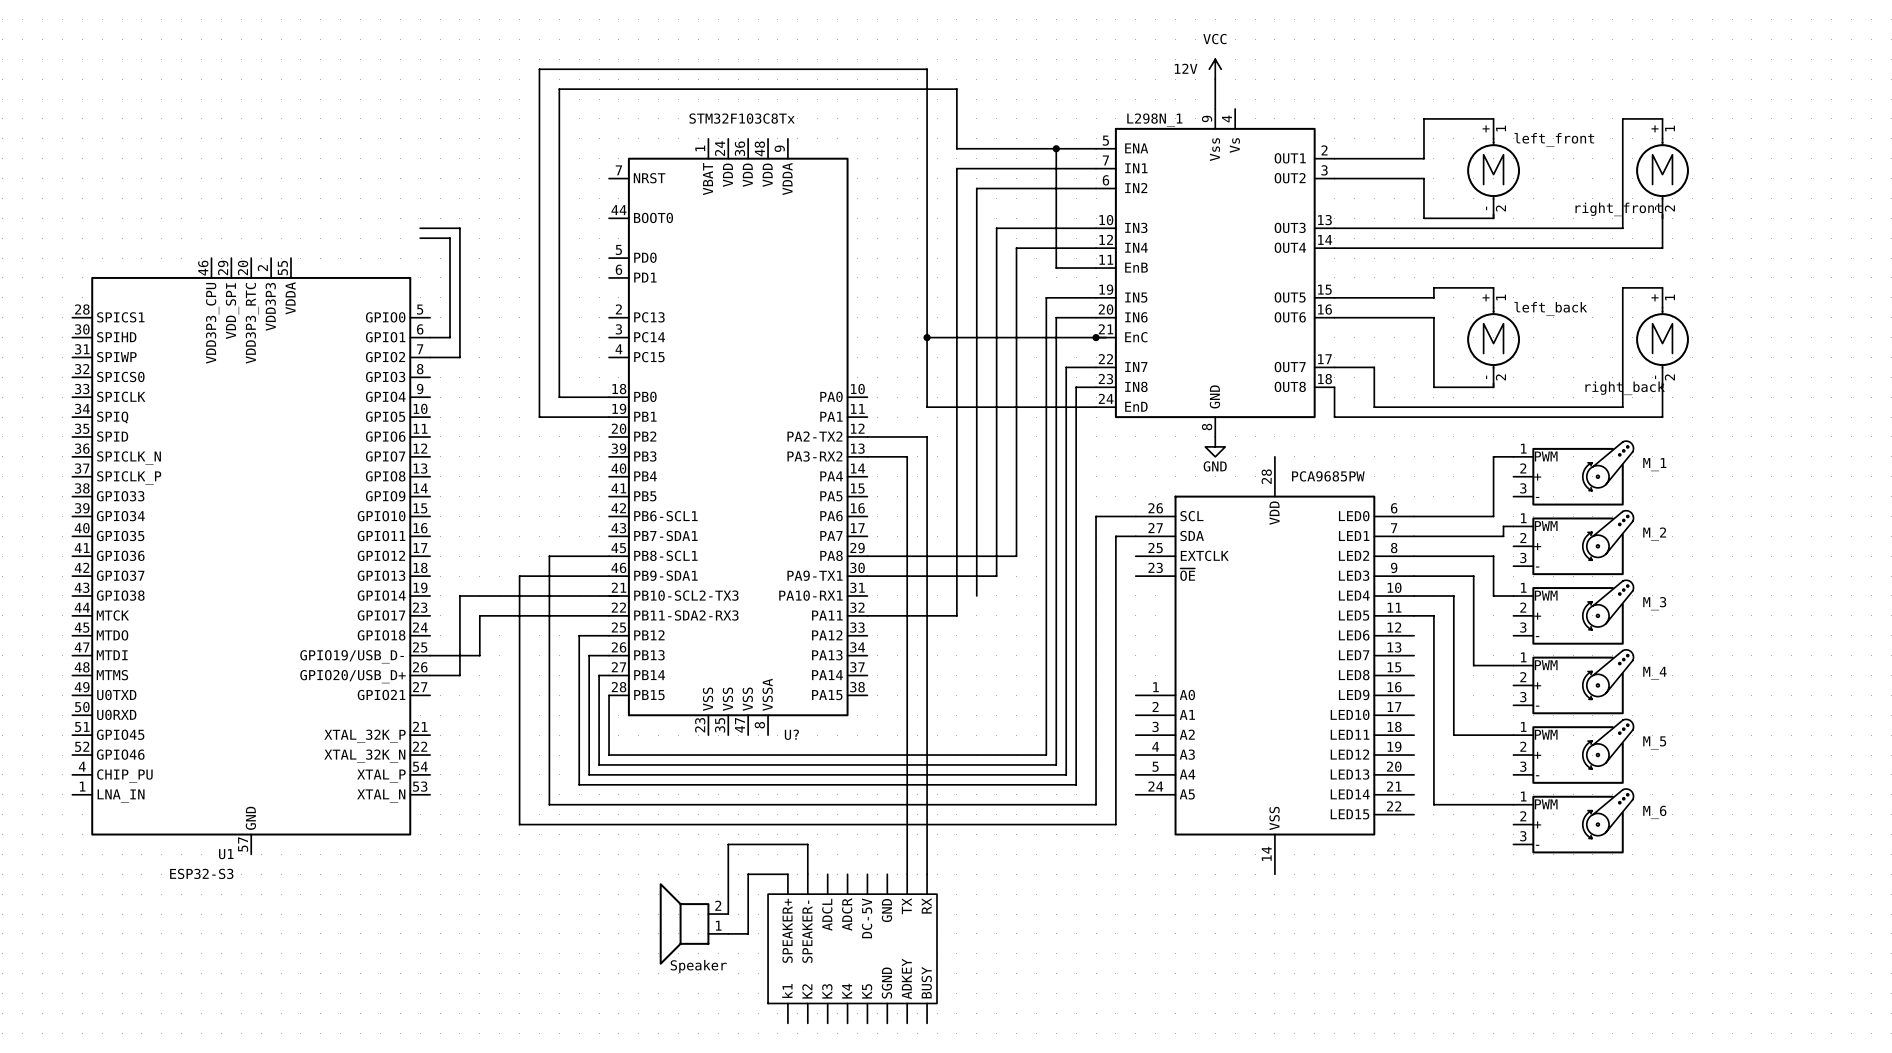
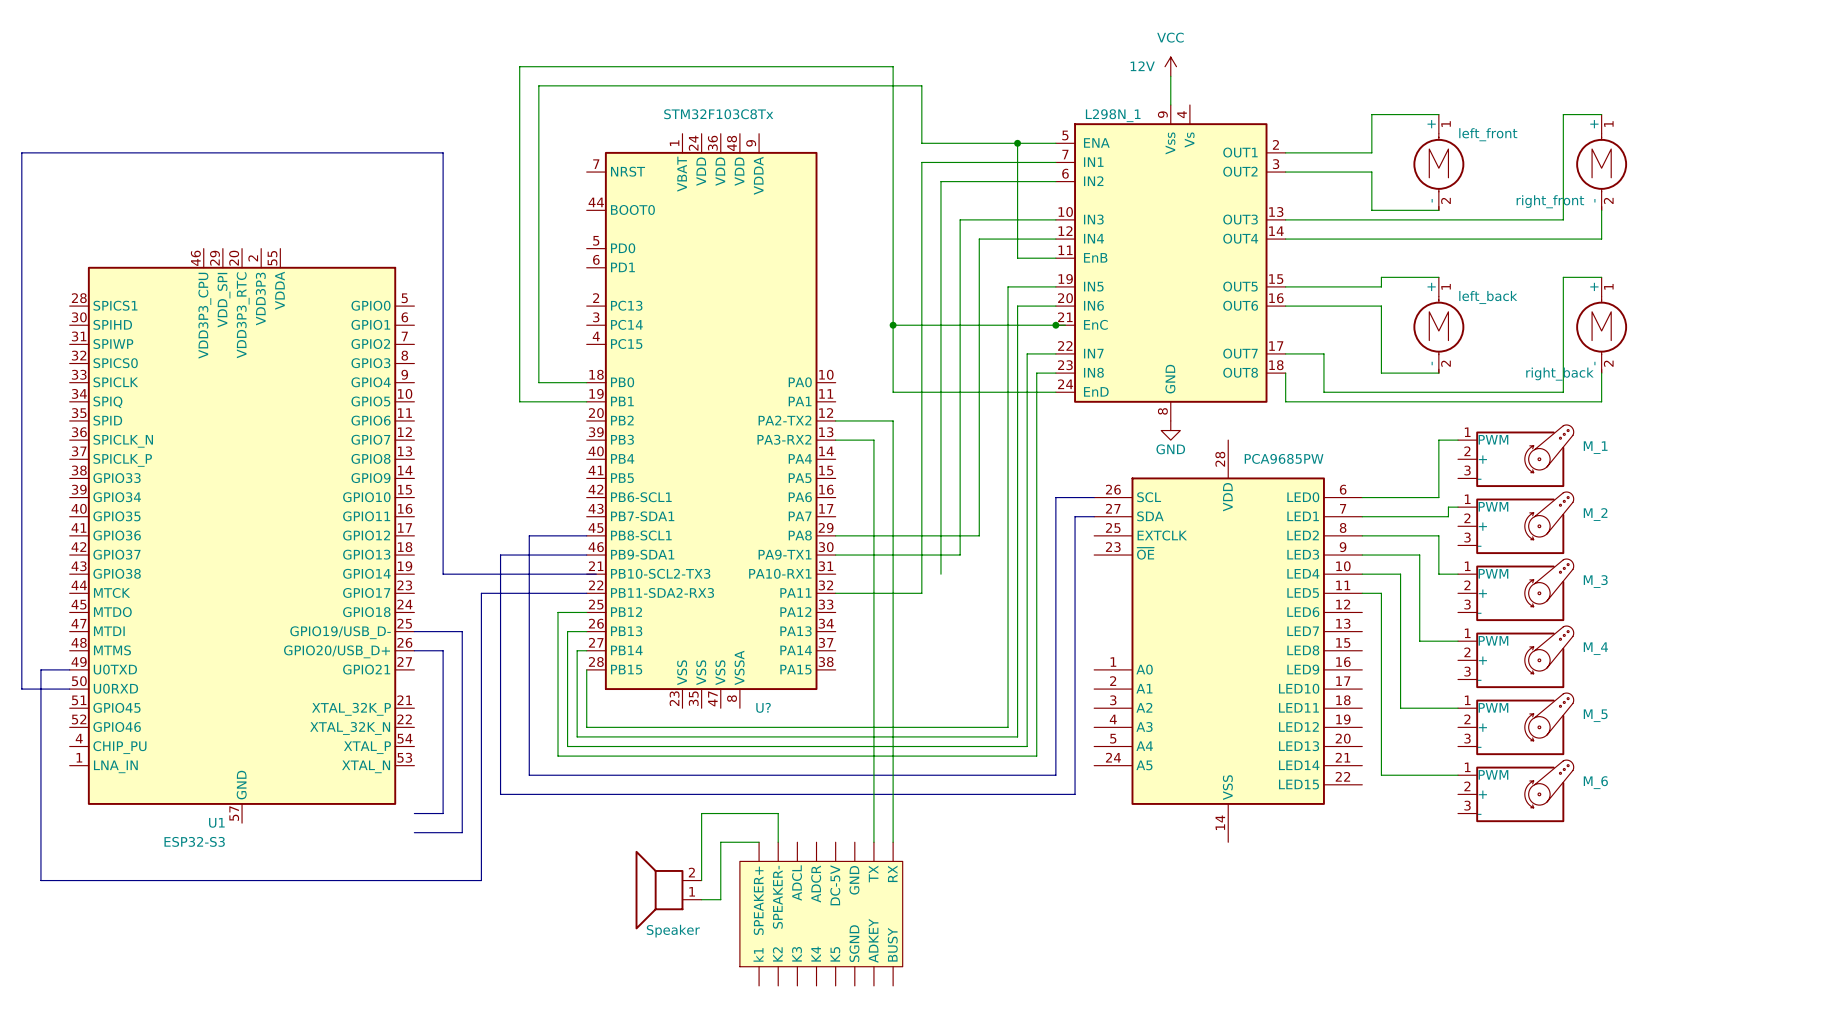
bus: (420, 228) (459, 228) -> (69, 689) (21, 689) (21, 152) (443, 152) (443, 219)
bus: (420, 238) (450, 238) (450, 337) (430, 337) -> none
bus: (430, 357) (459, 357) -> (443, 574) (443, 344)
bus: (459, 595) (459, 675) -> (414, 813) (443, 813) (443, 650)
bus: (499, 615) (479, 615) (479, 655) -> (414, 832) (462, 832) (462, 631)
bus: none -> (481, 593) (481, 880) (40, 880) (40, 669) (69, 669)

